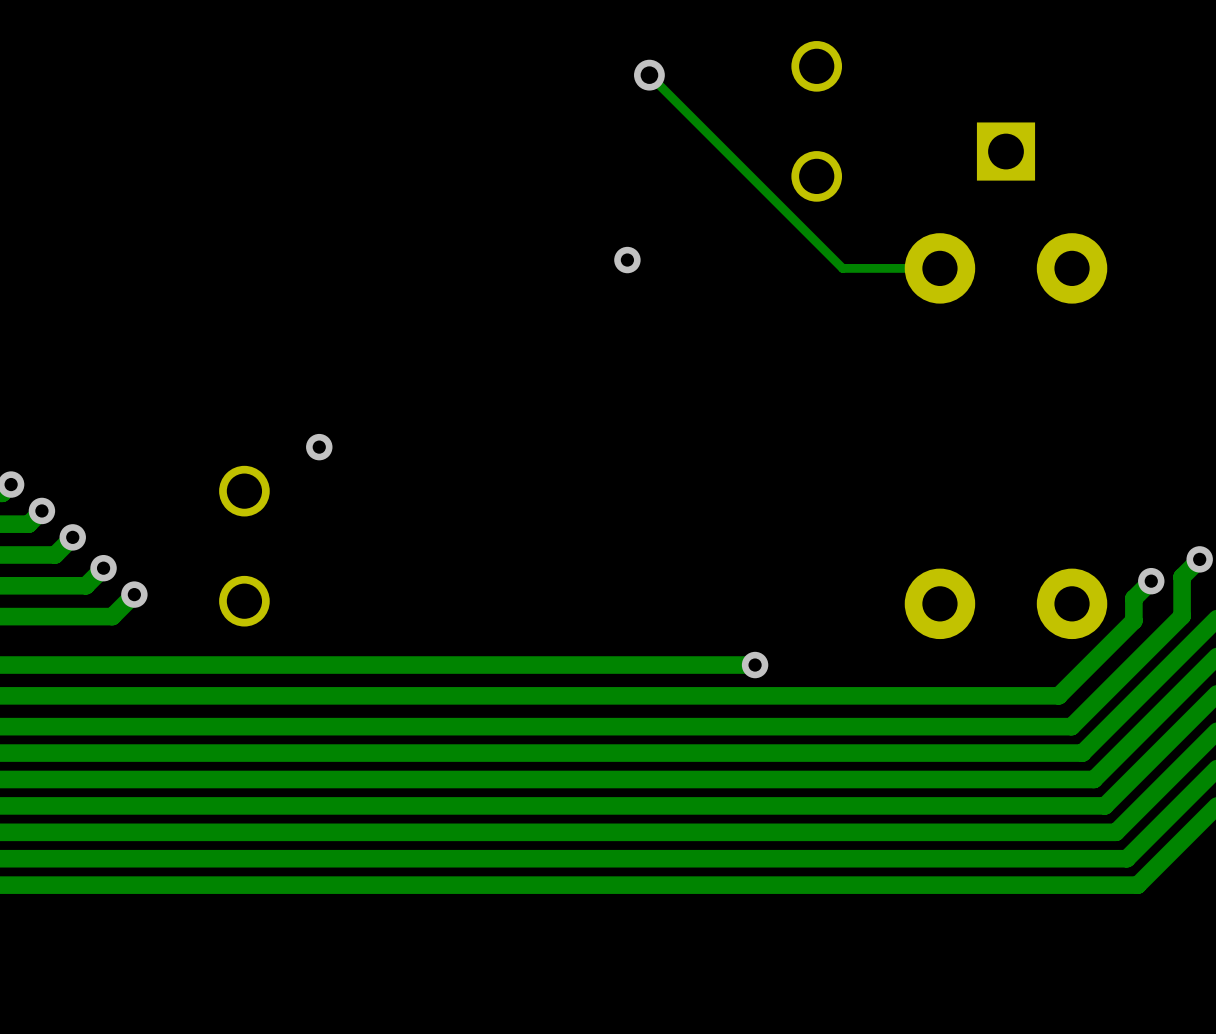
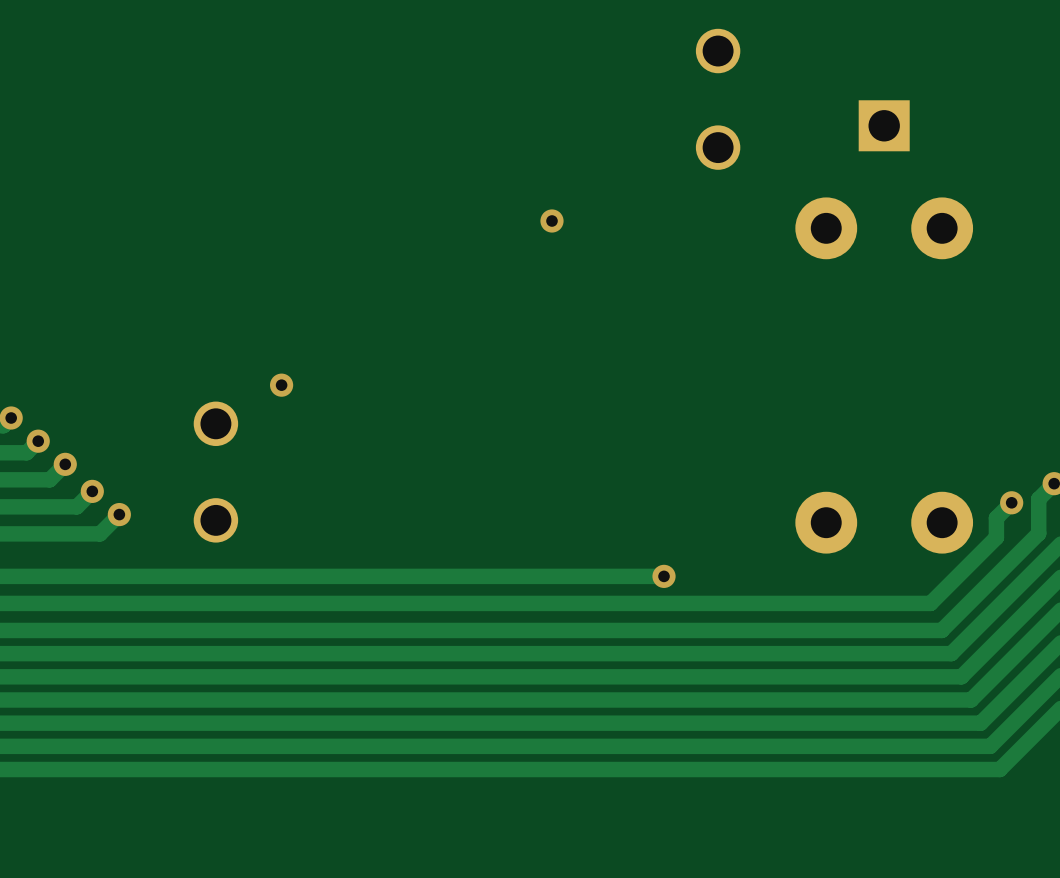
track: (649, 75) (842, 268) (939, 268) -> none
via: (649, 75) -> none

